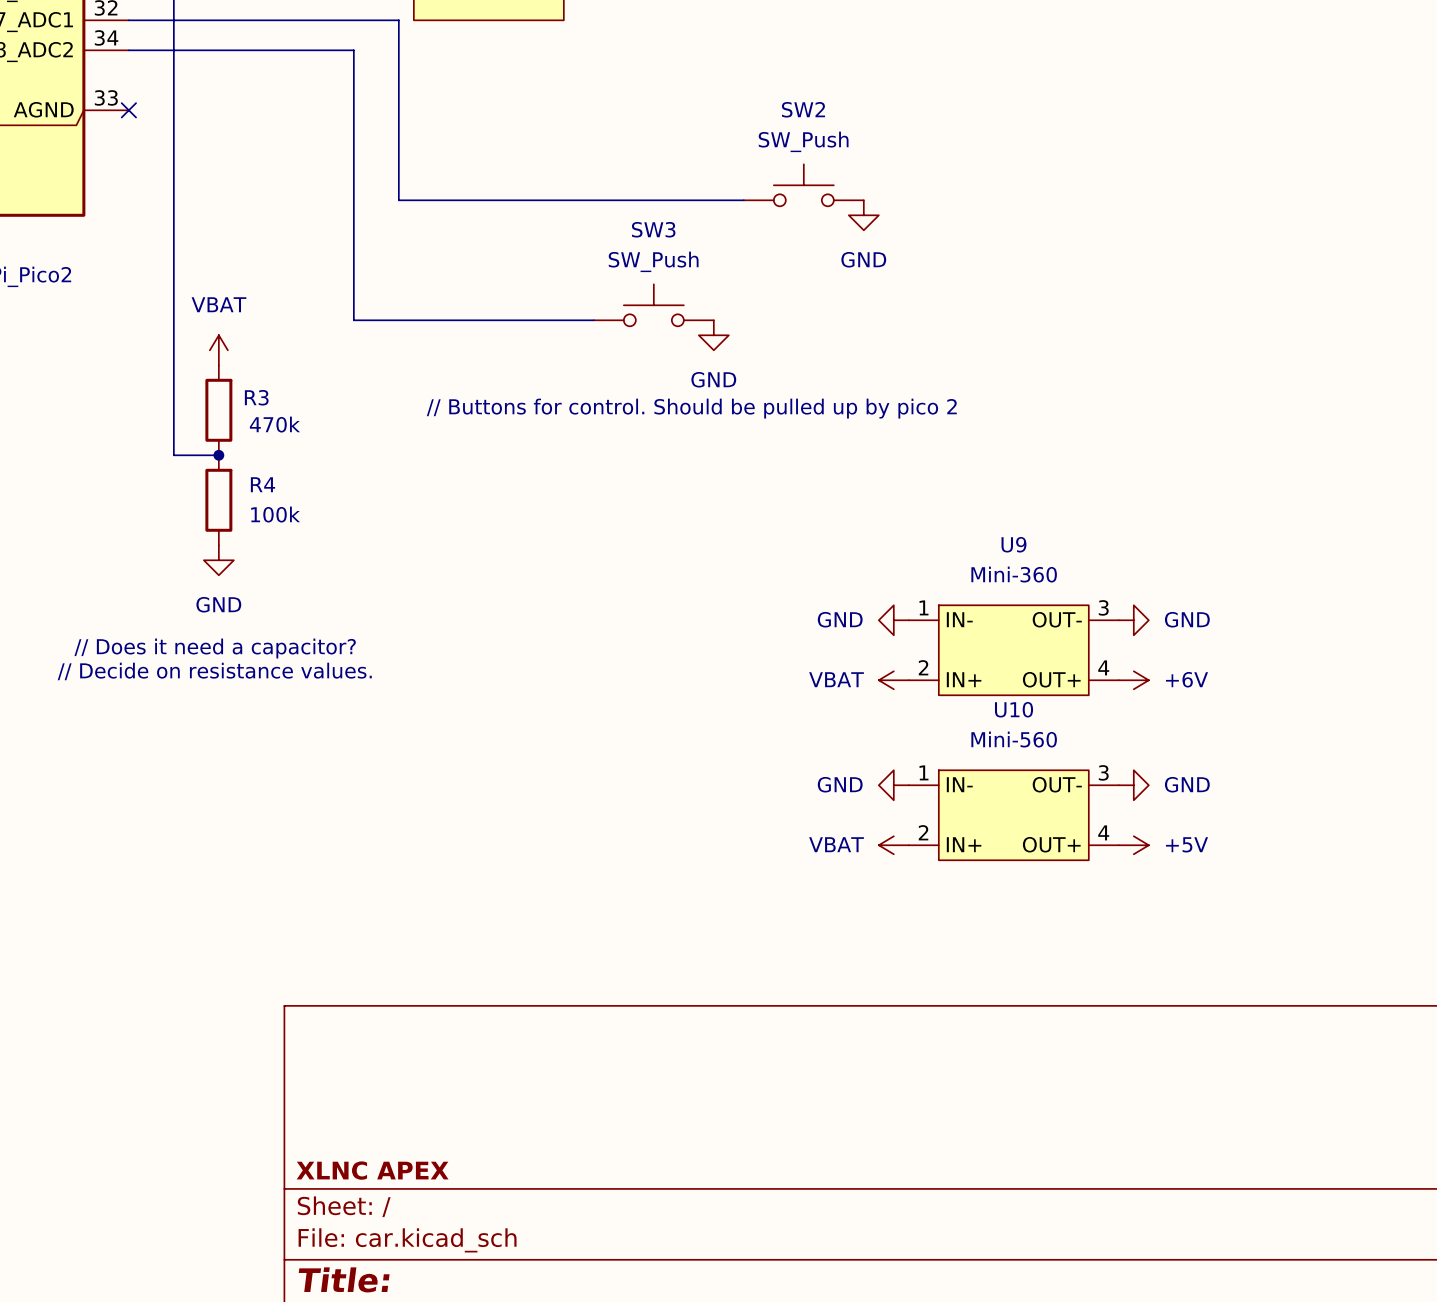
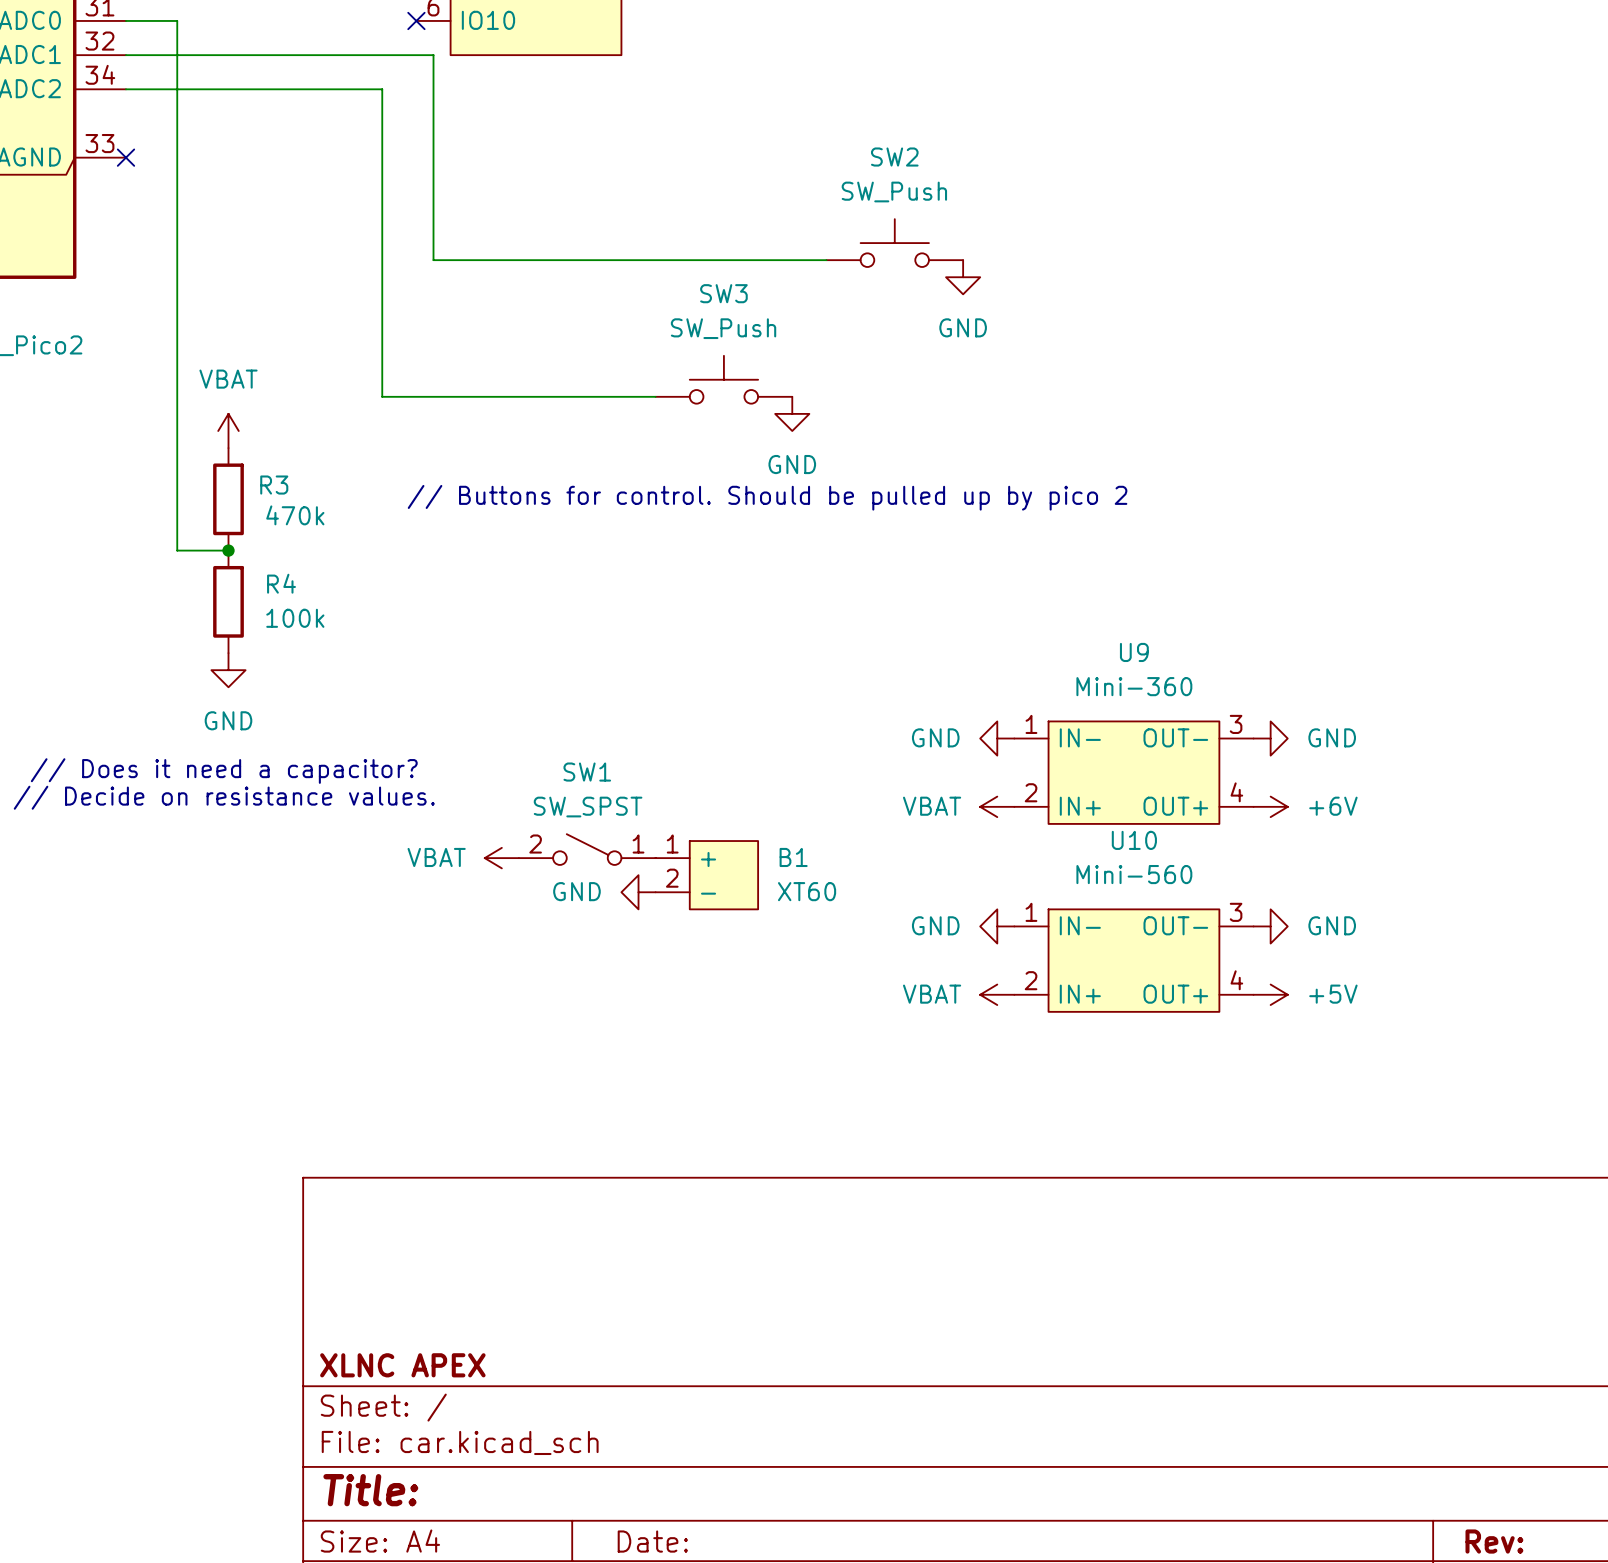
SW1: none -> SW_SPST (587, 849)
power symbol: none -> VBAT (501, 858)
B1: none -> XT60 (706, 875)
power symbol: none -> GND (638, 892)

